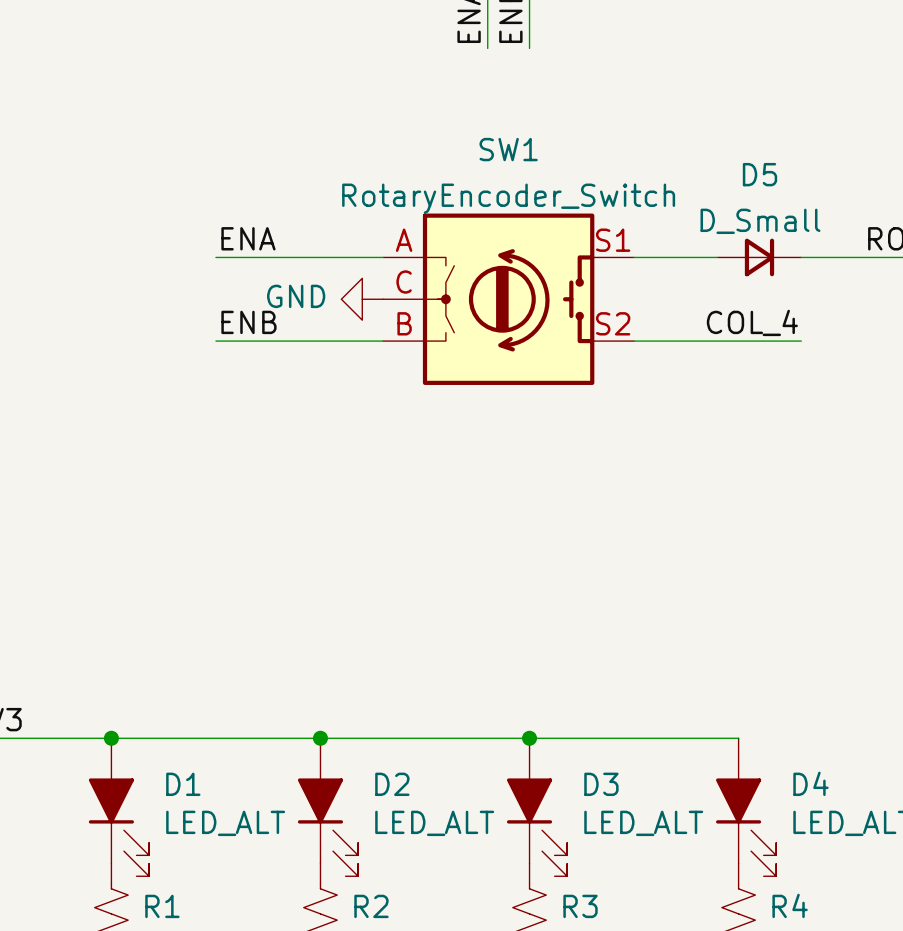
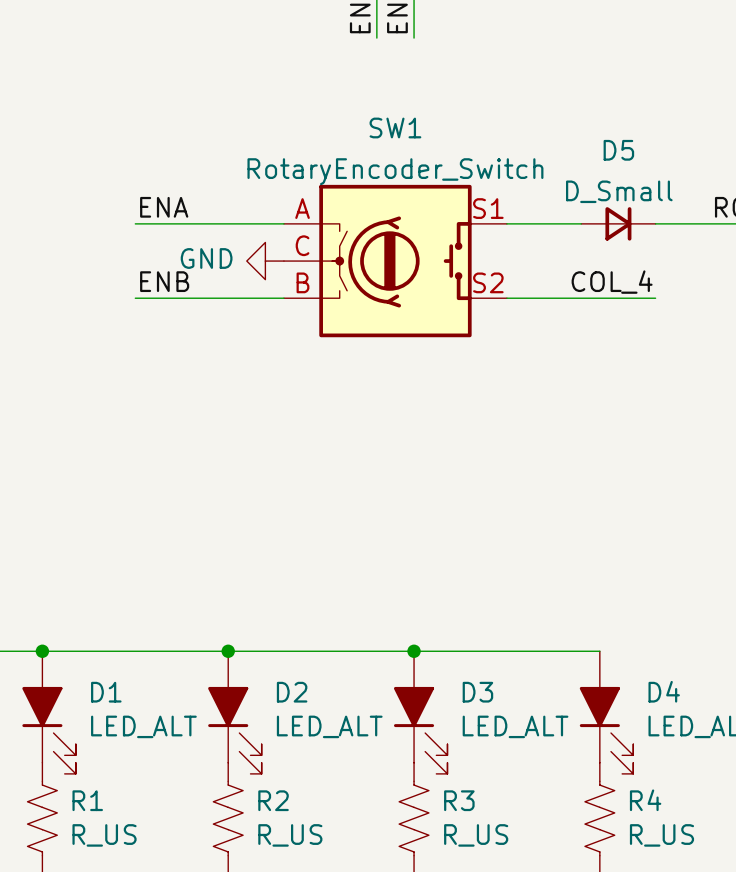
SW1 symbol: [383, 213, 635, 385] -> [283, 184, 507, 338]

